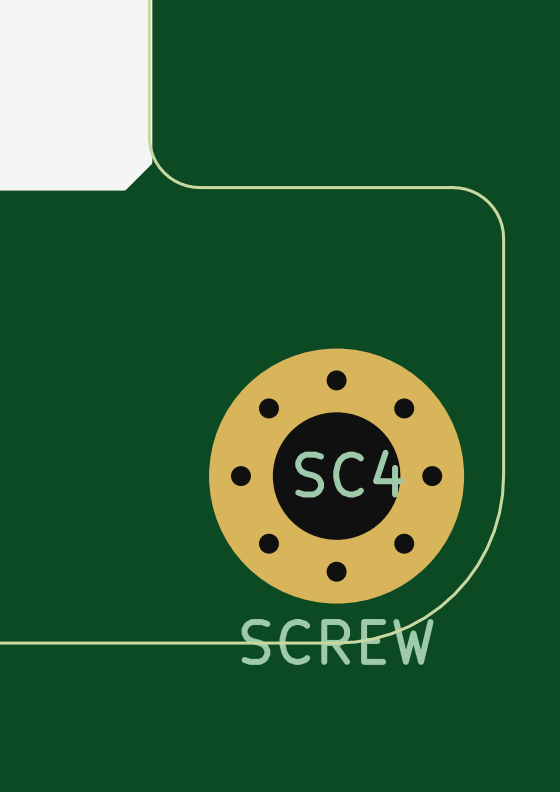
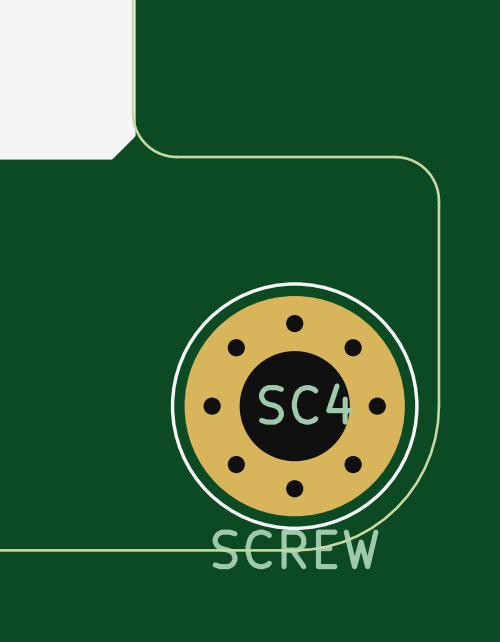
SC4 footprint: [209, 348, 465, 604] -> [170, 282, 419, 531]

